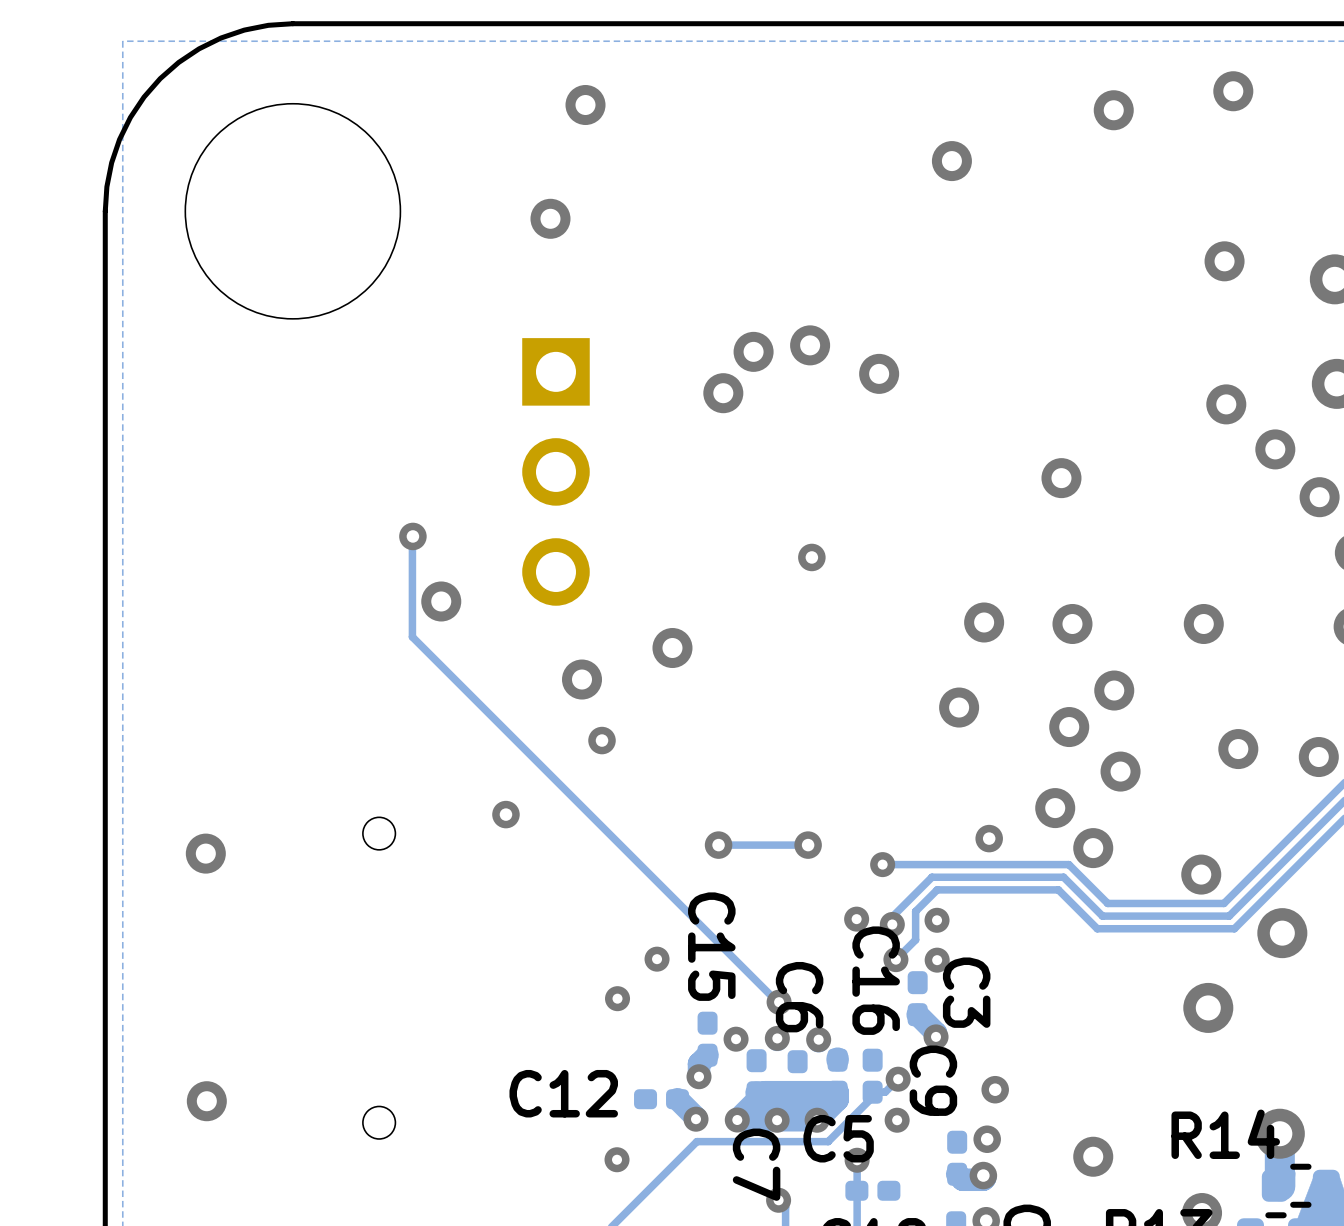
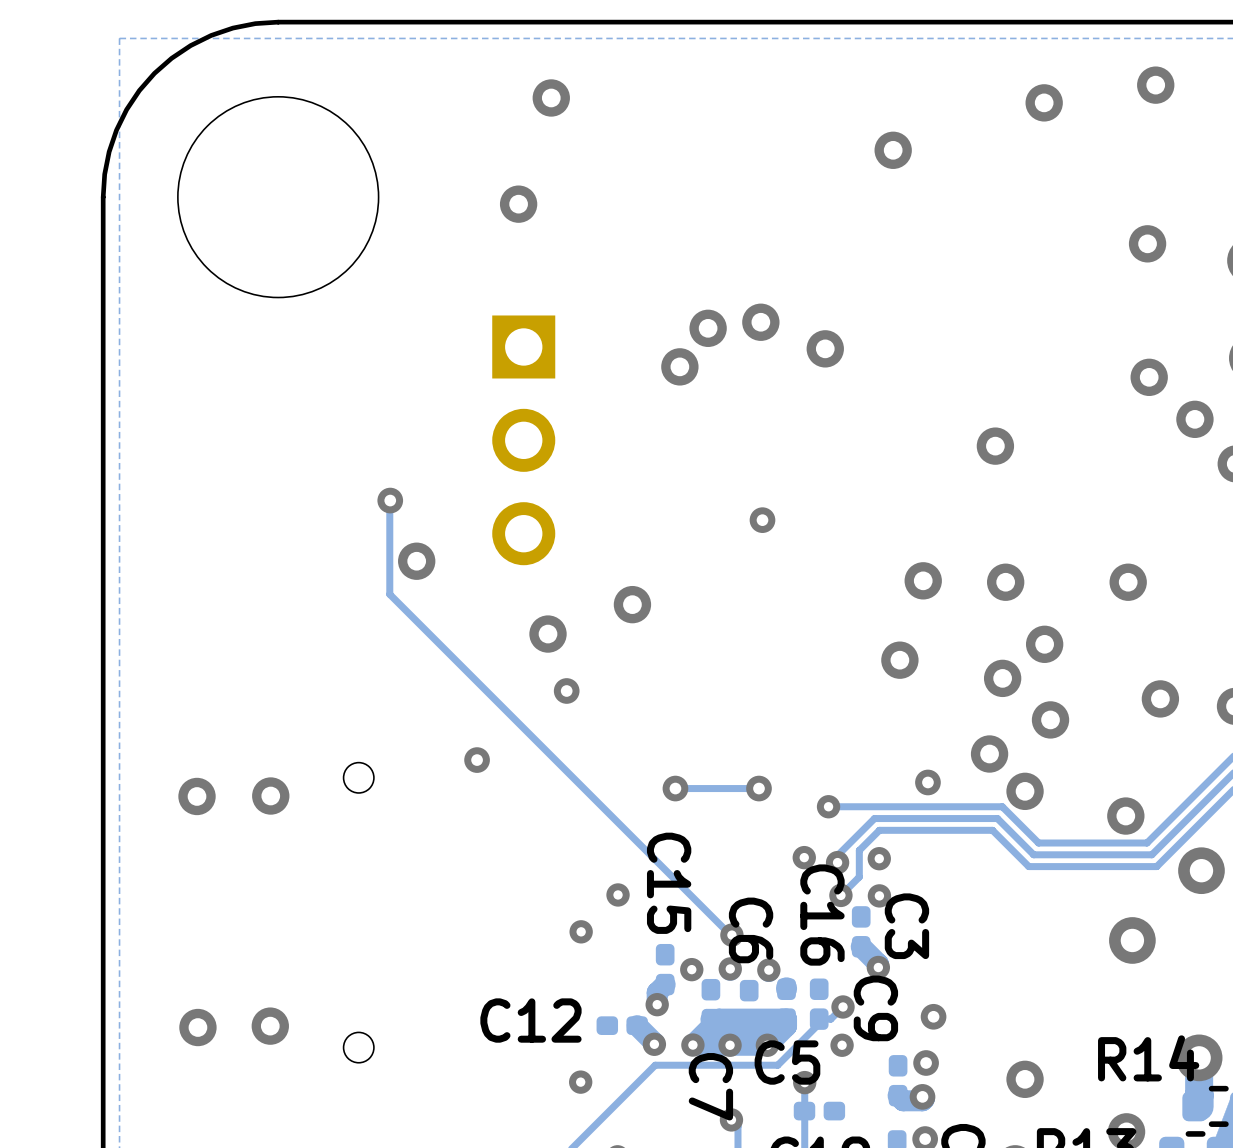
via: none -> (270, 796)
via: none -> (270, 1026)

